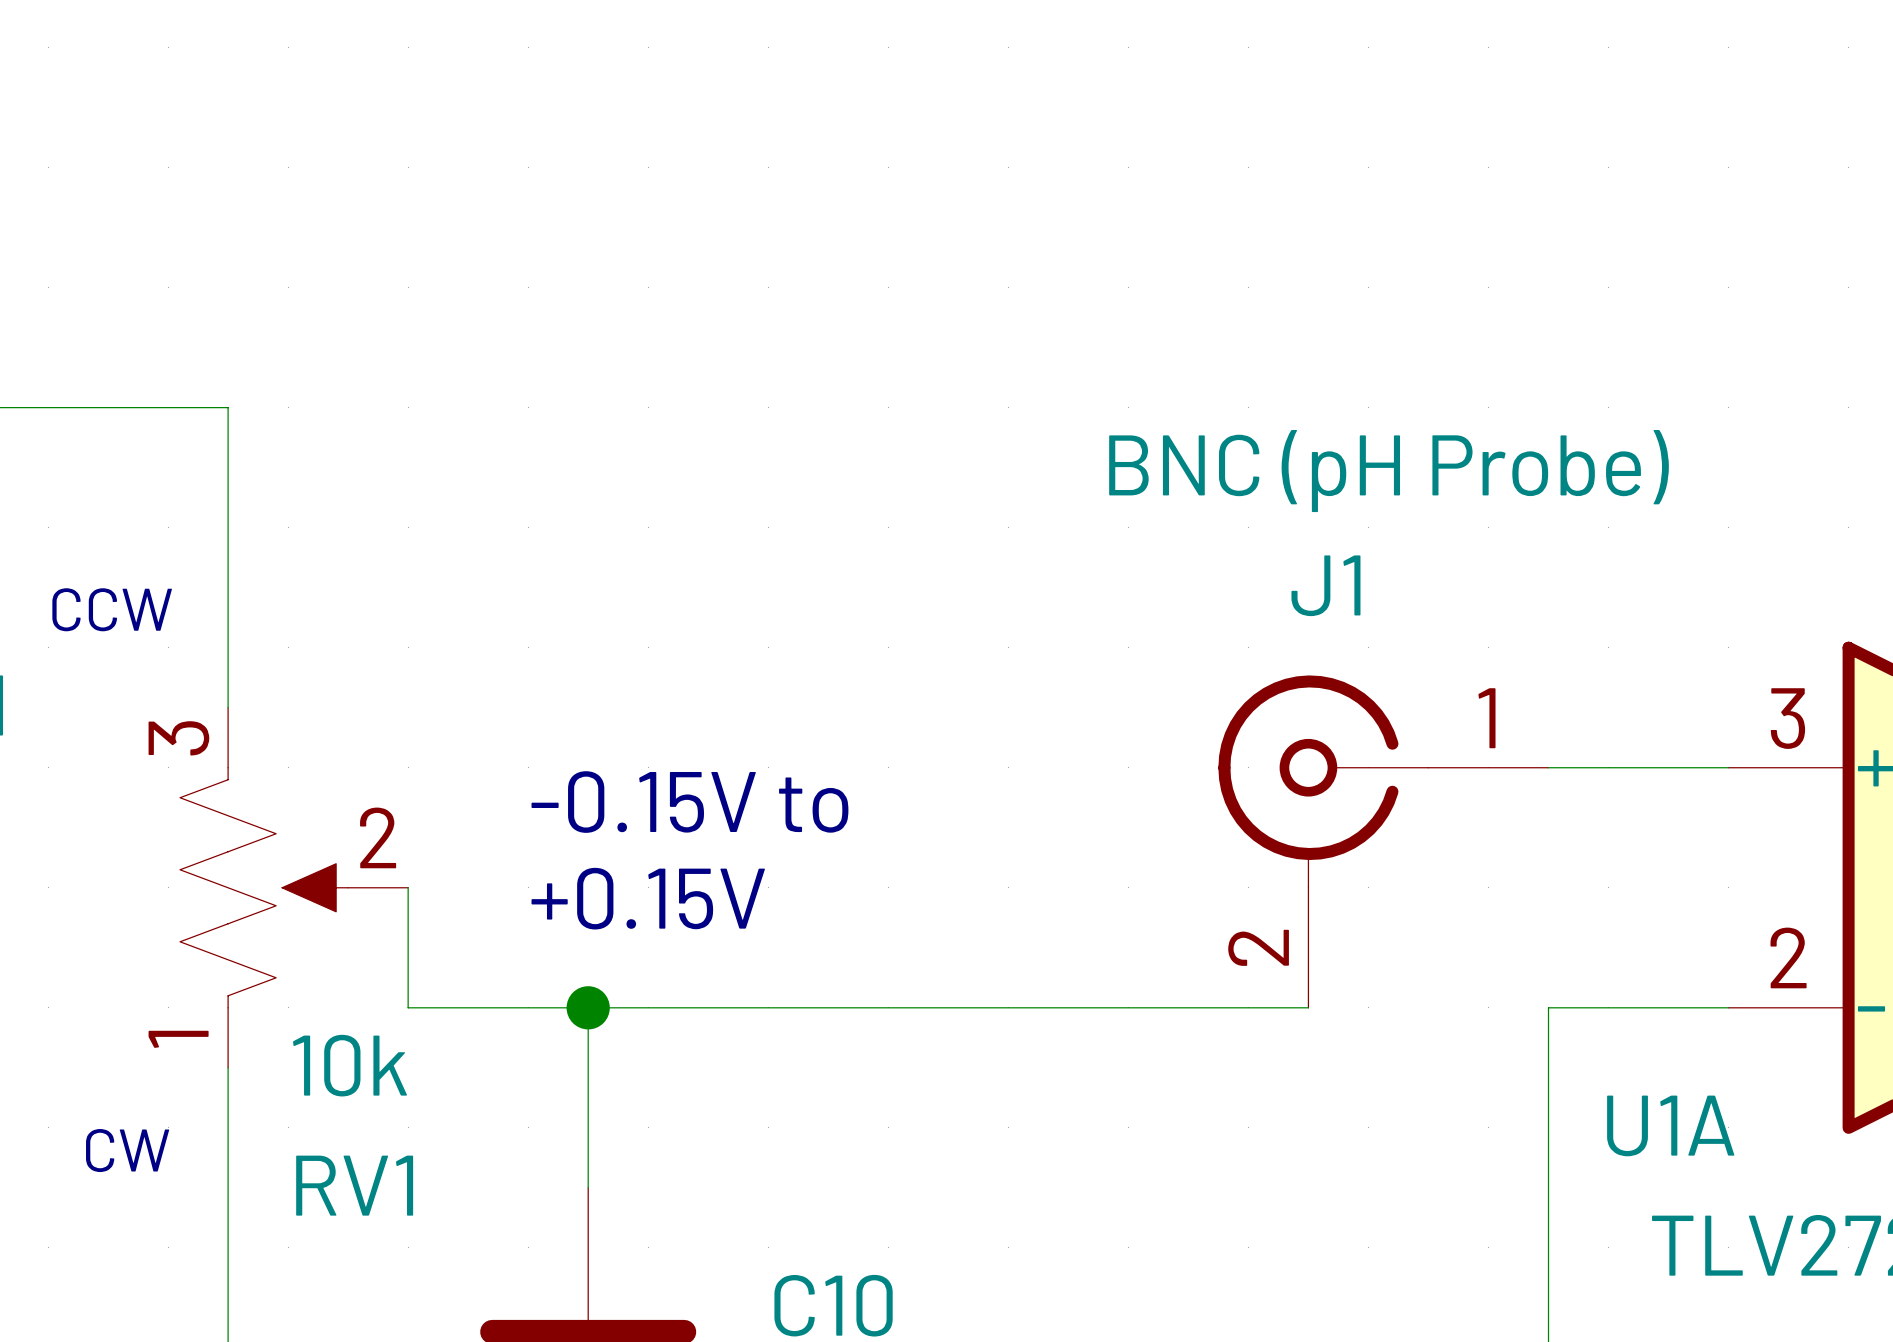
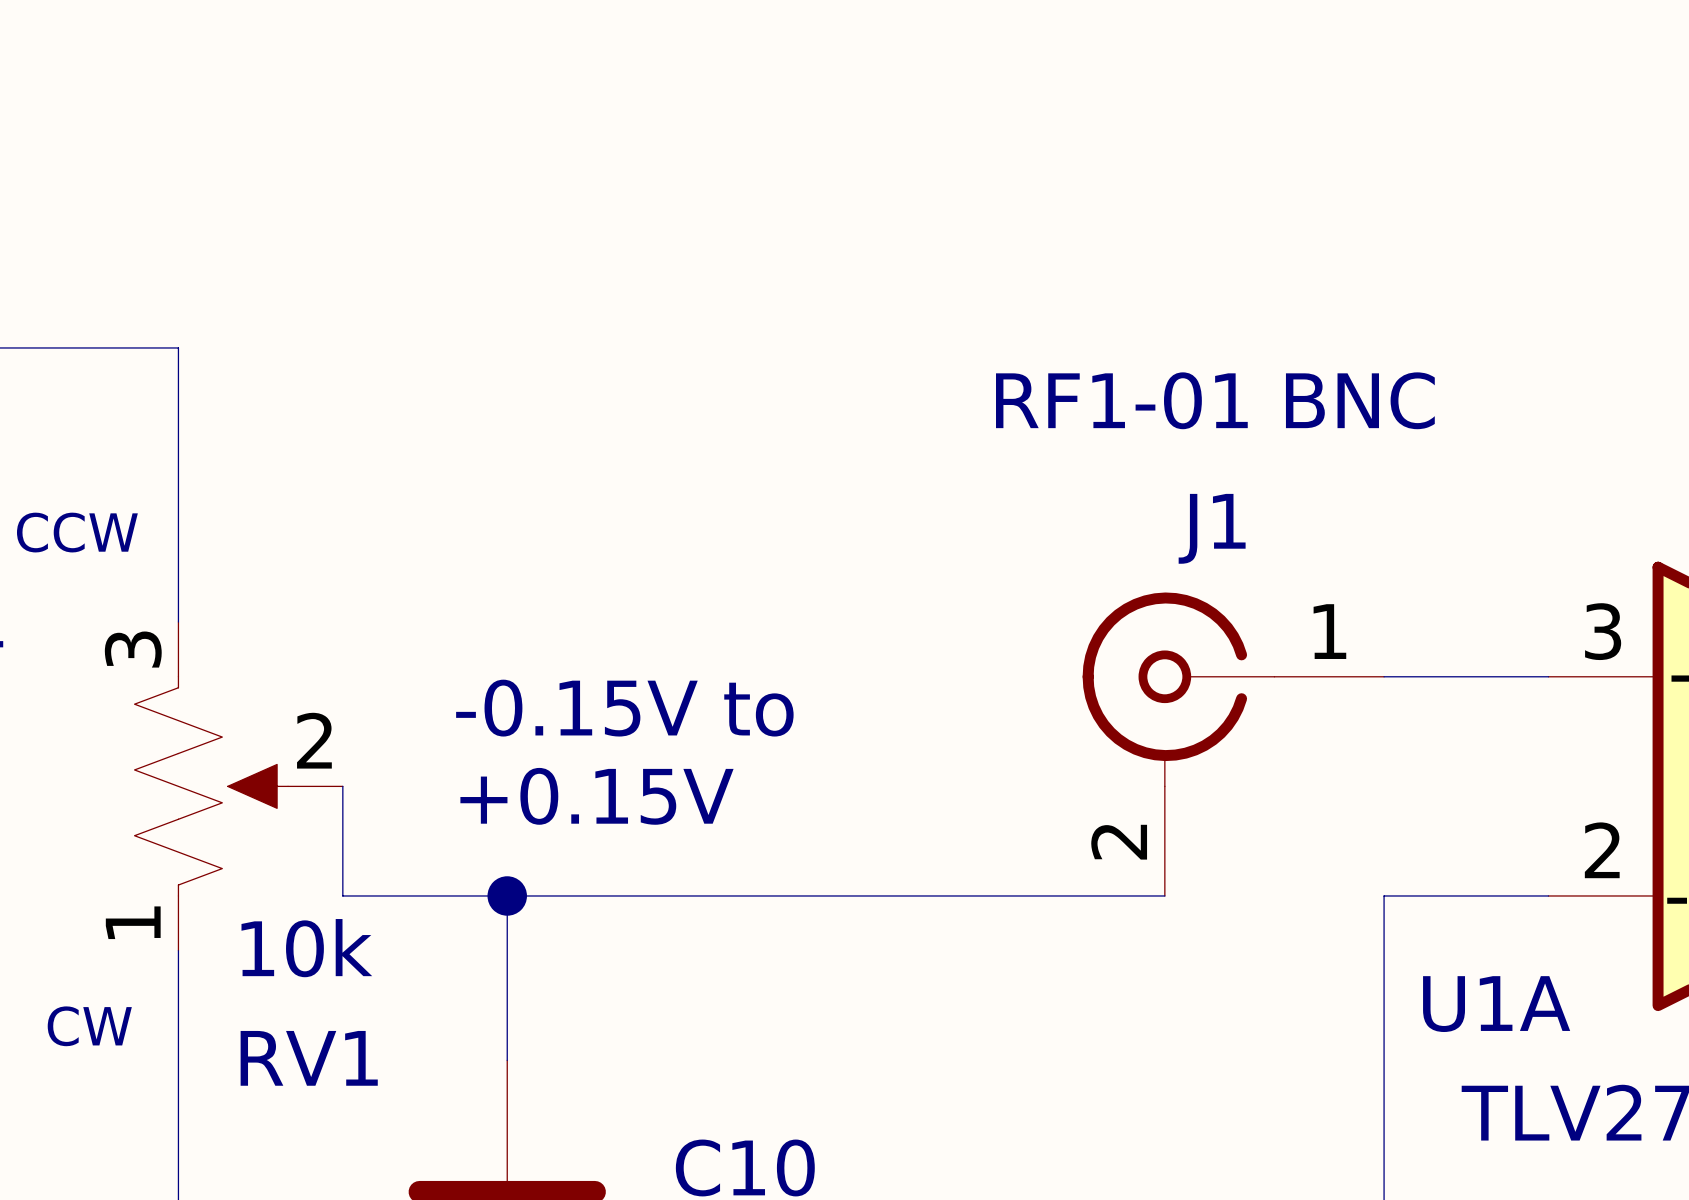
J1 value: BNC (pH Probe) (1389, 471) -> RF1-01 BNC (1215, 400)
J1 name position: J1 (1325, 585) -> J1 (1212, 528)

